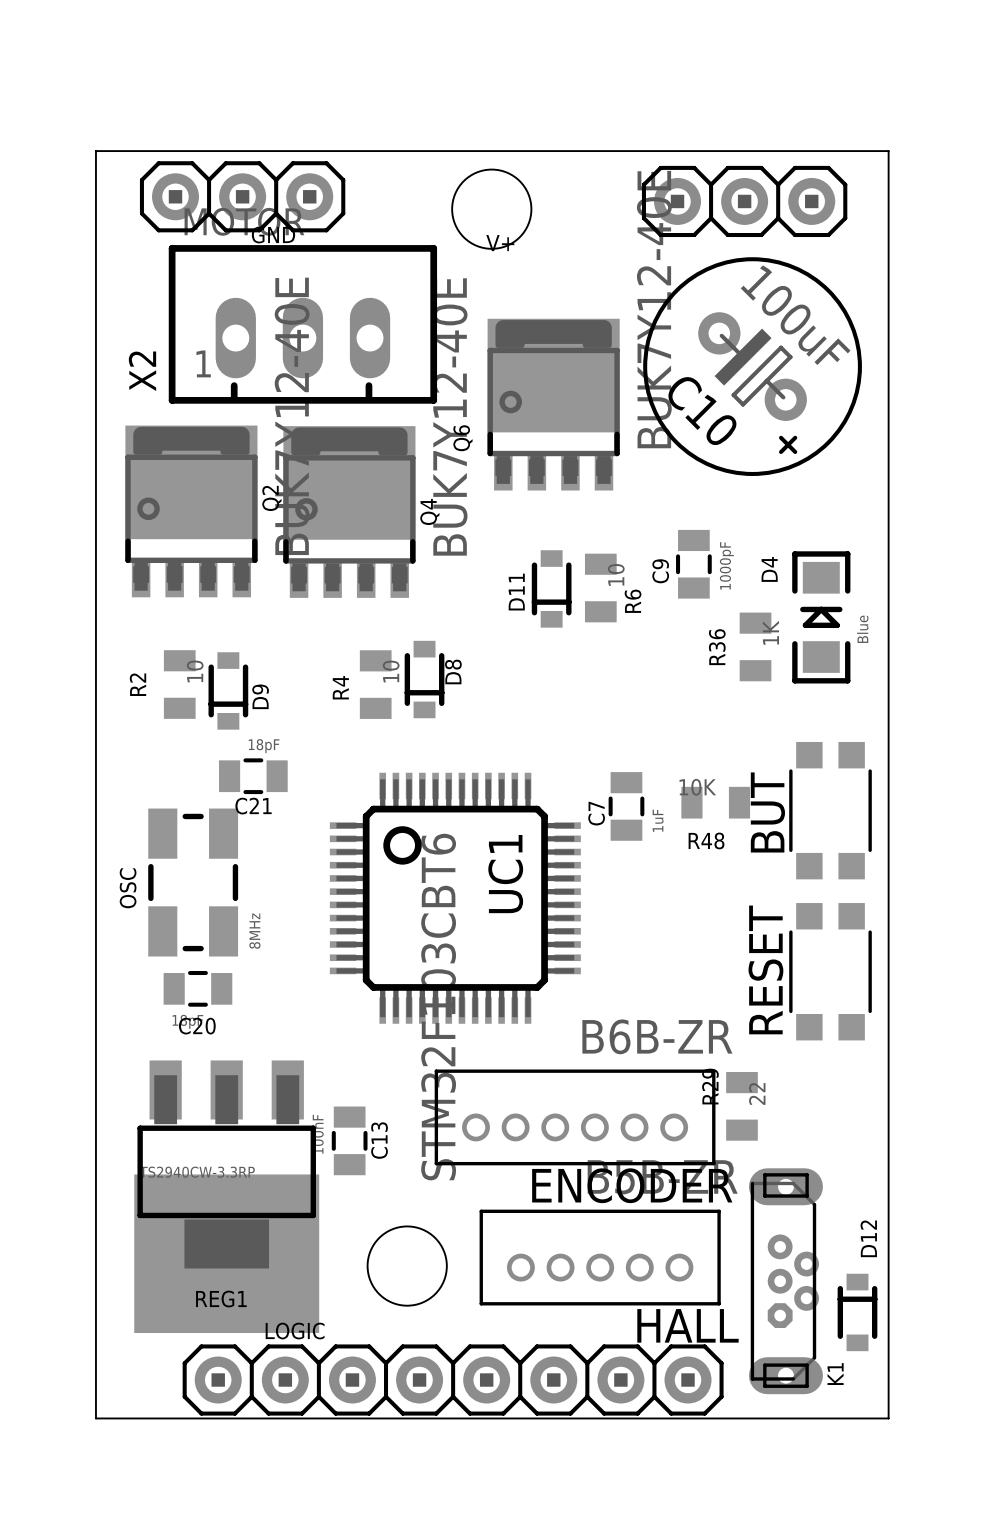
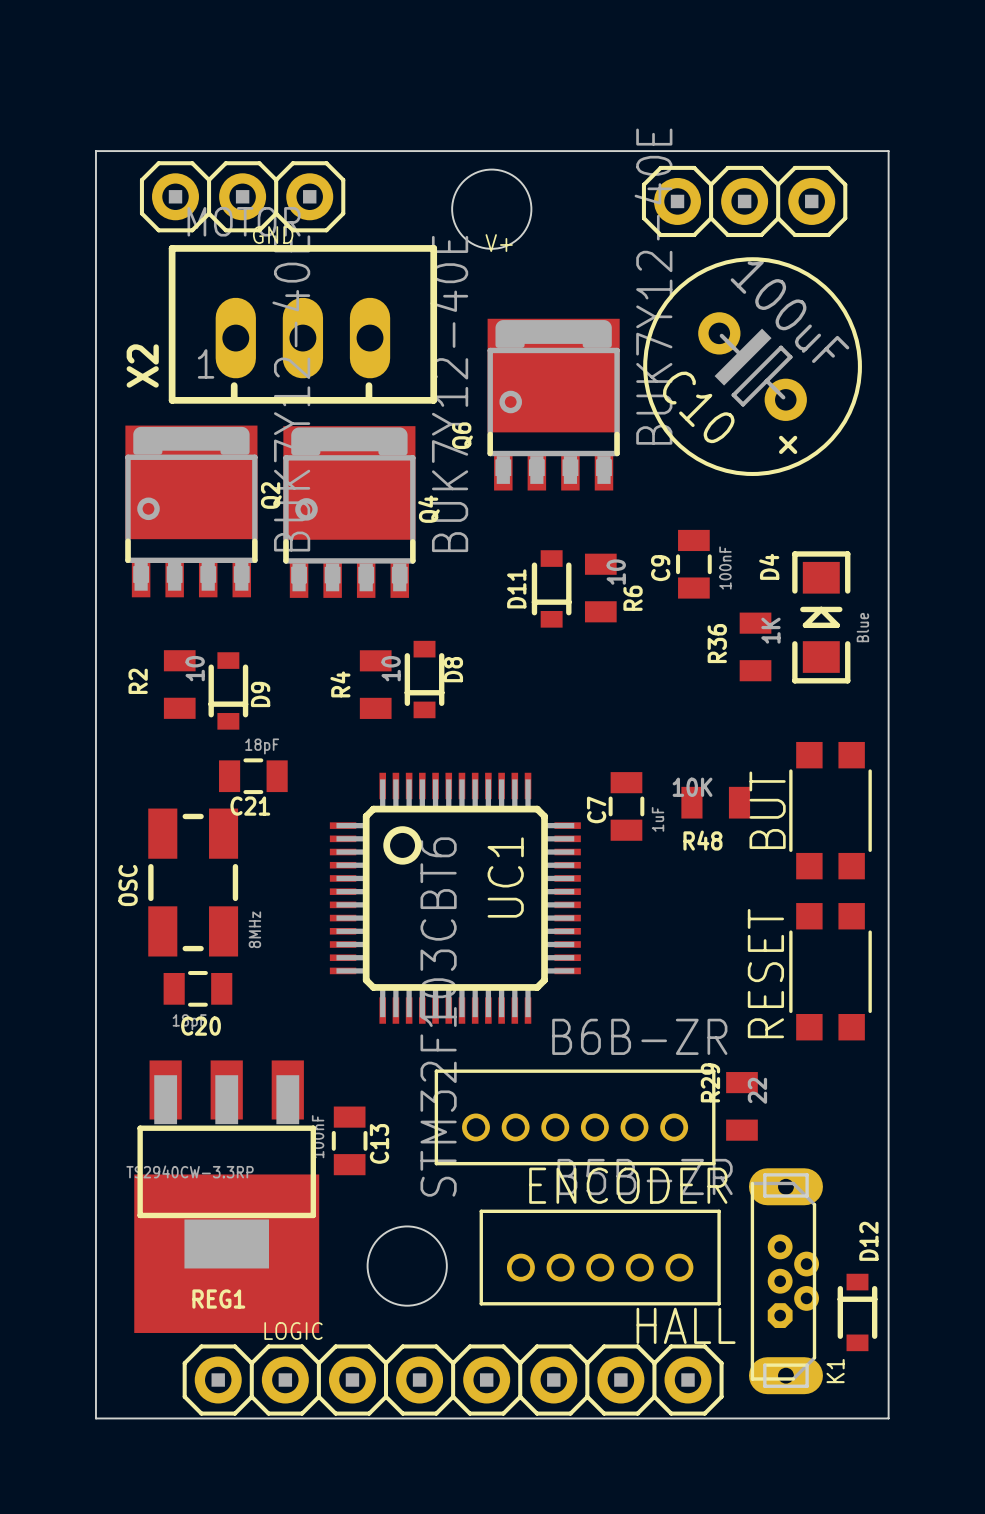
C9 value: 1000pF (726, 565) -> 100nF (725, 567)

